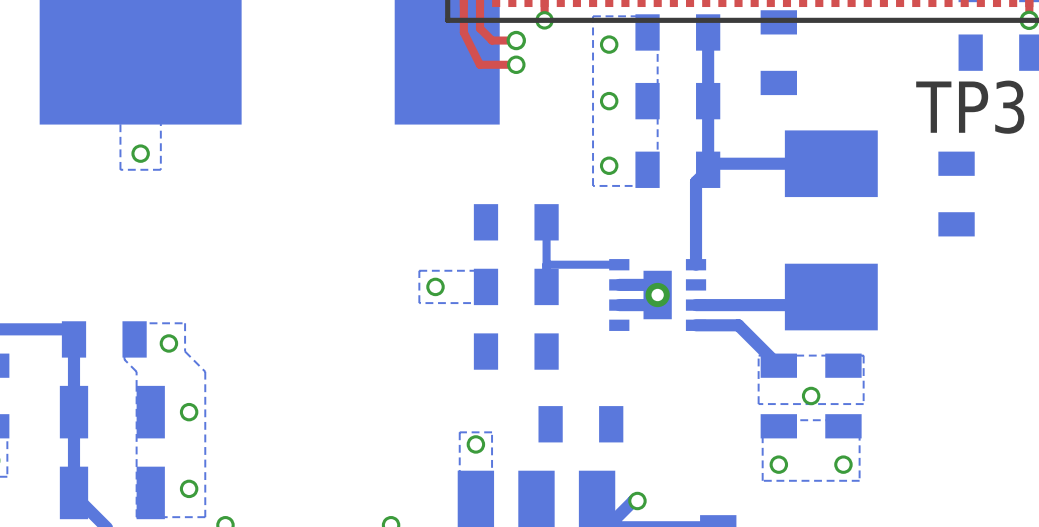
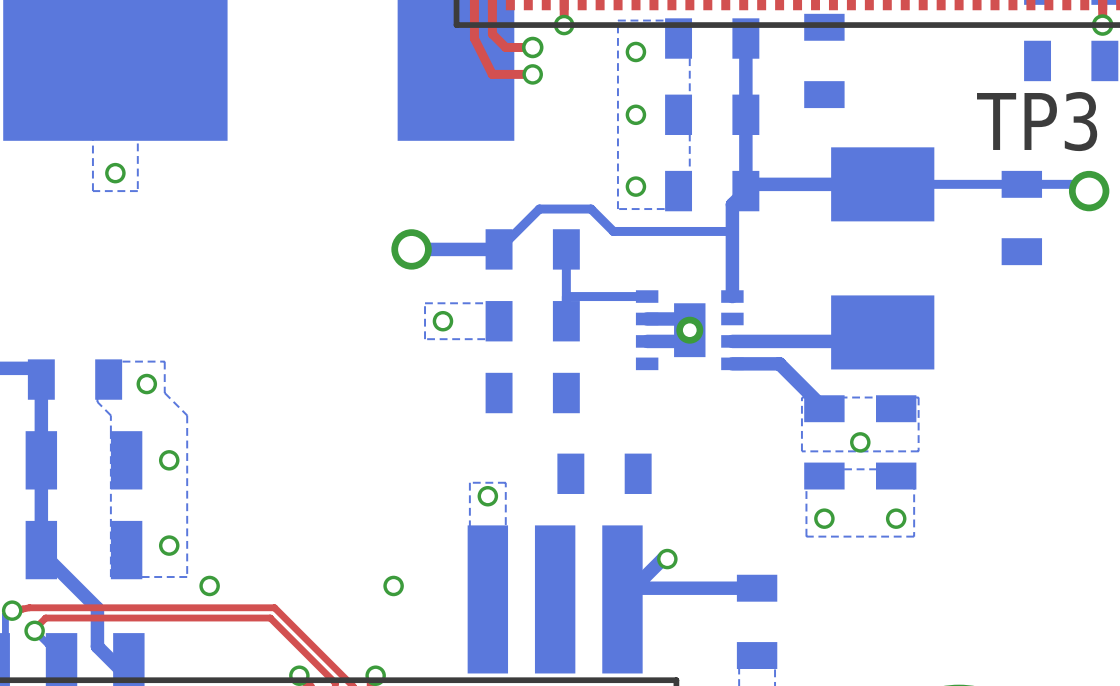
bottom track: none -> (882, 184) (1082, 184) (1089, 191)
via: none -> (1089, 191)
bottom track: none -> (732, 204) (732, 229) (730, 231) (613, 231) (591, 209) (539, 209) (499, 249) (411, 249)
via: none -> (411, 249)

